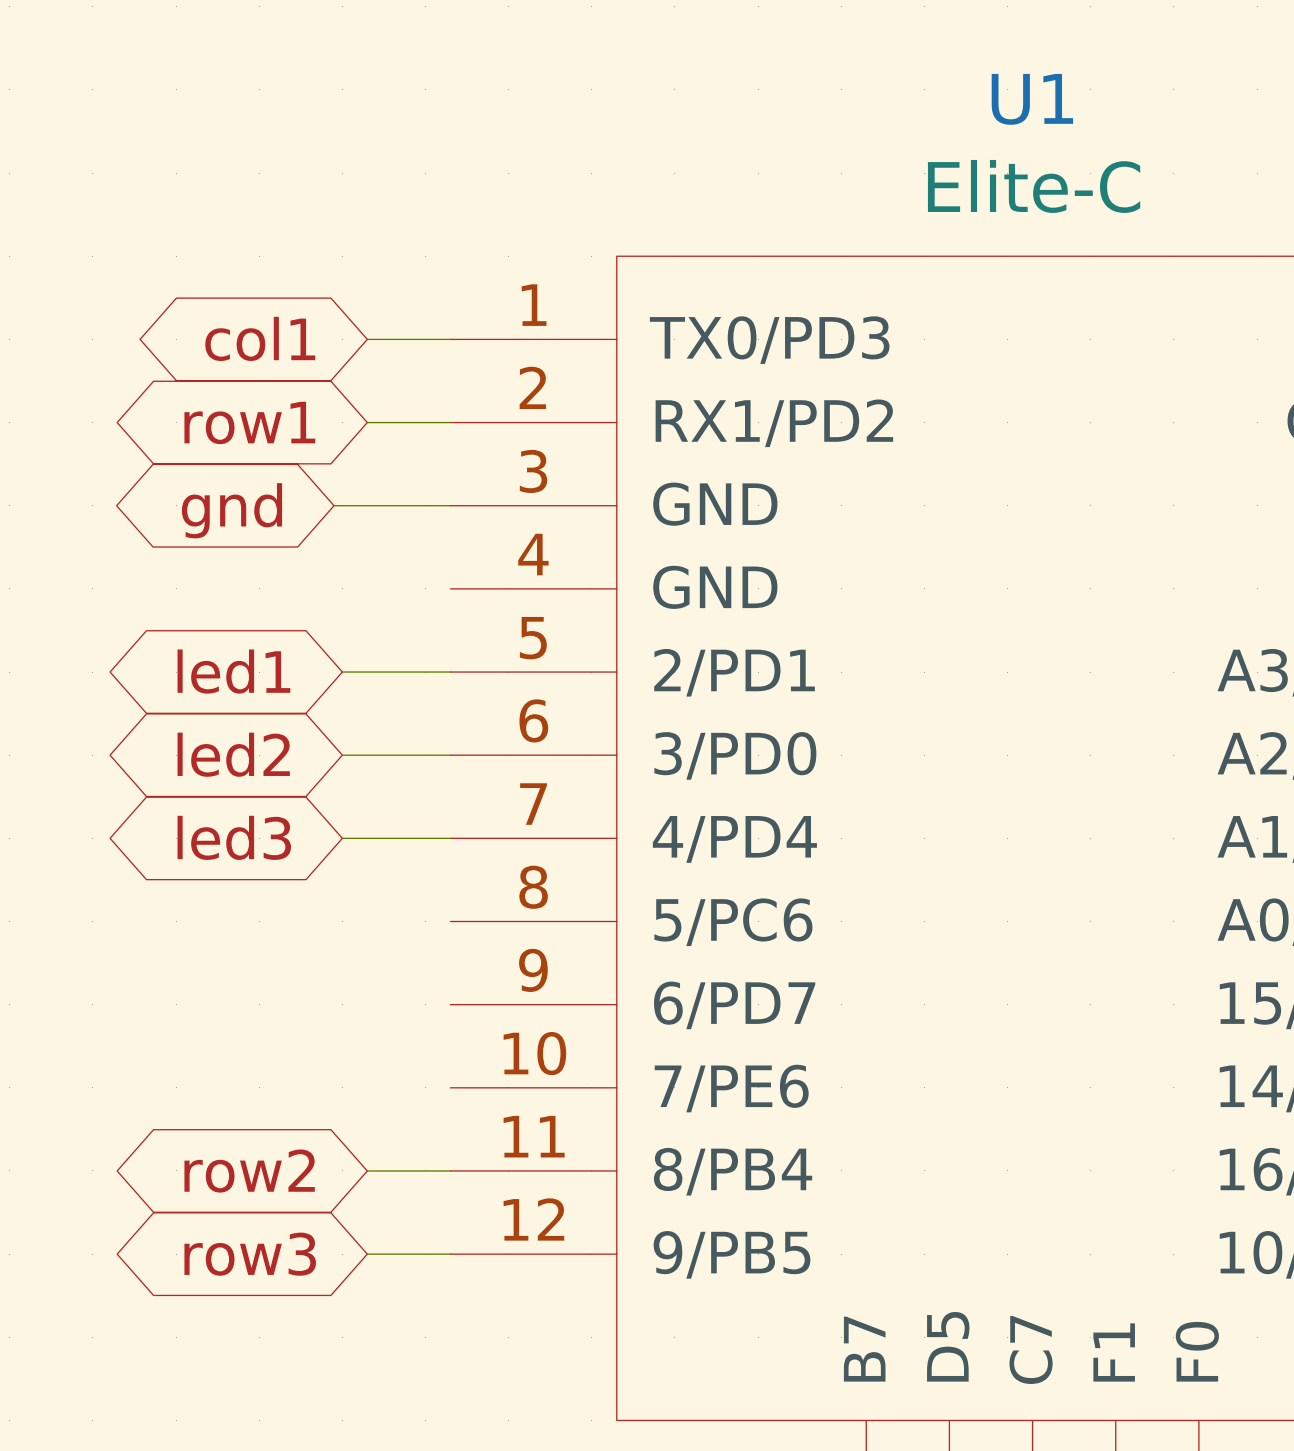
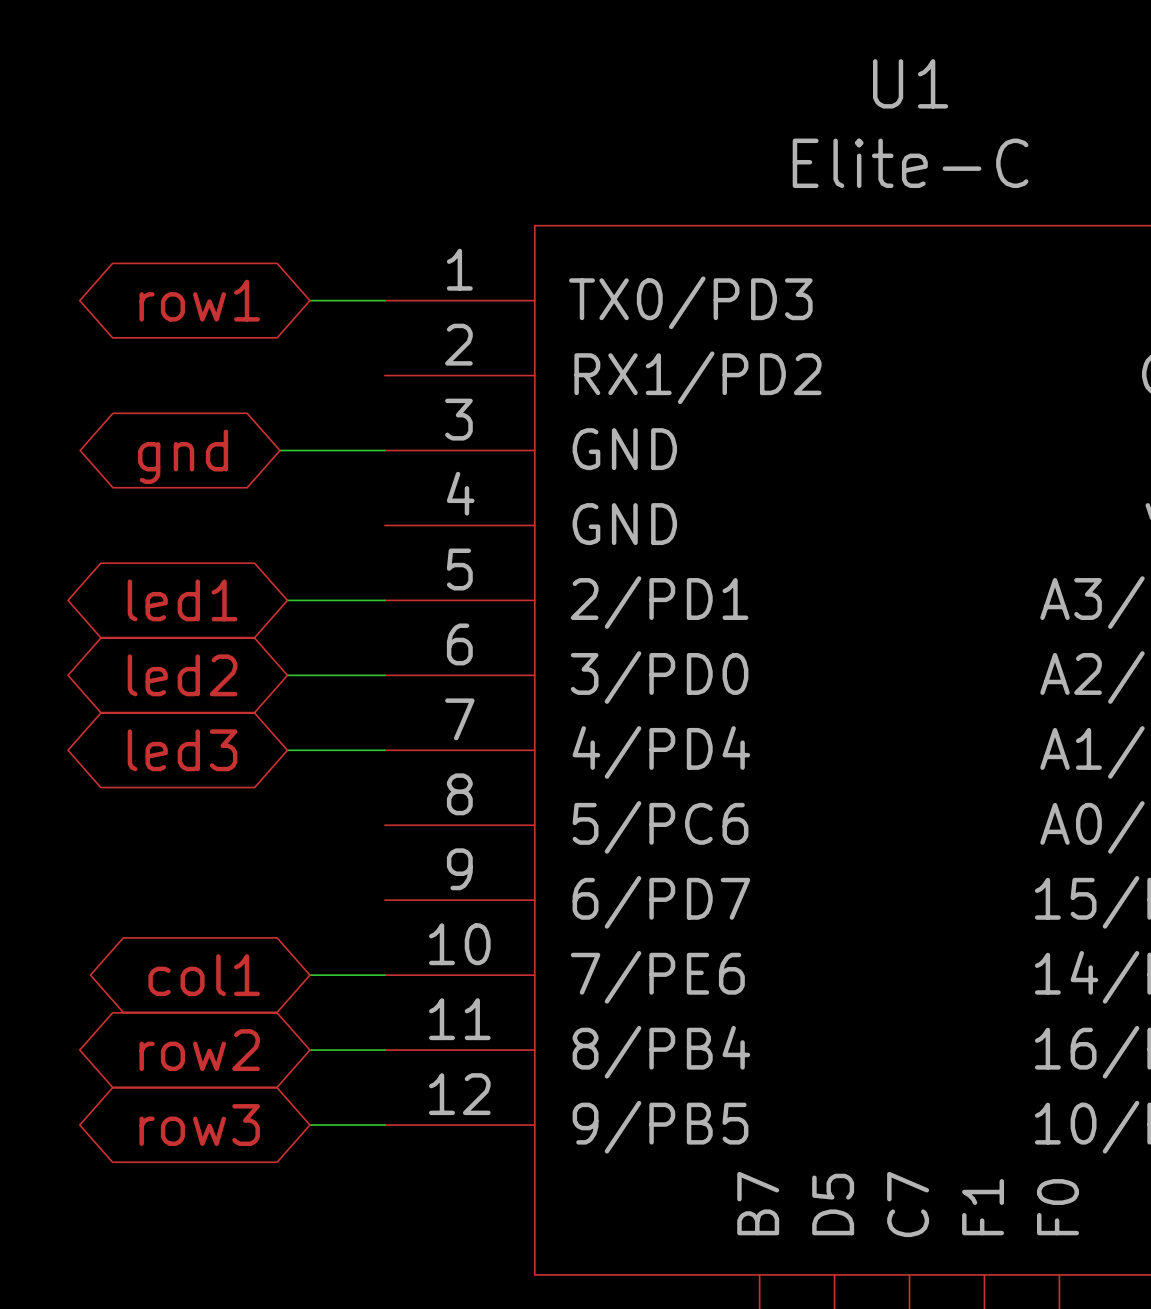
global label: col1 (260, 338) -> row1 (199, 300)
global label: row1 (249, 422) -> none
wire: (367, 422) (450, 422) -> (309, 975) (384, 975)
global label: none -> col1 (204, 975)

